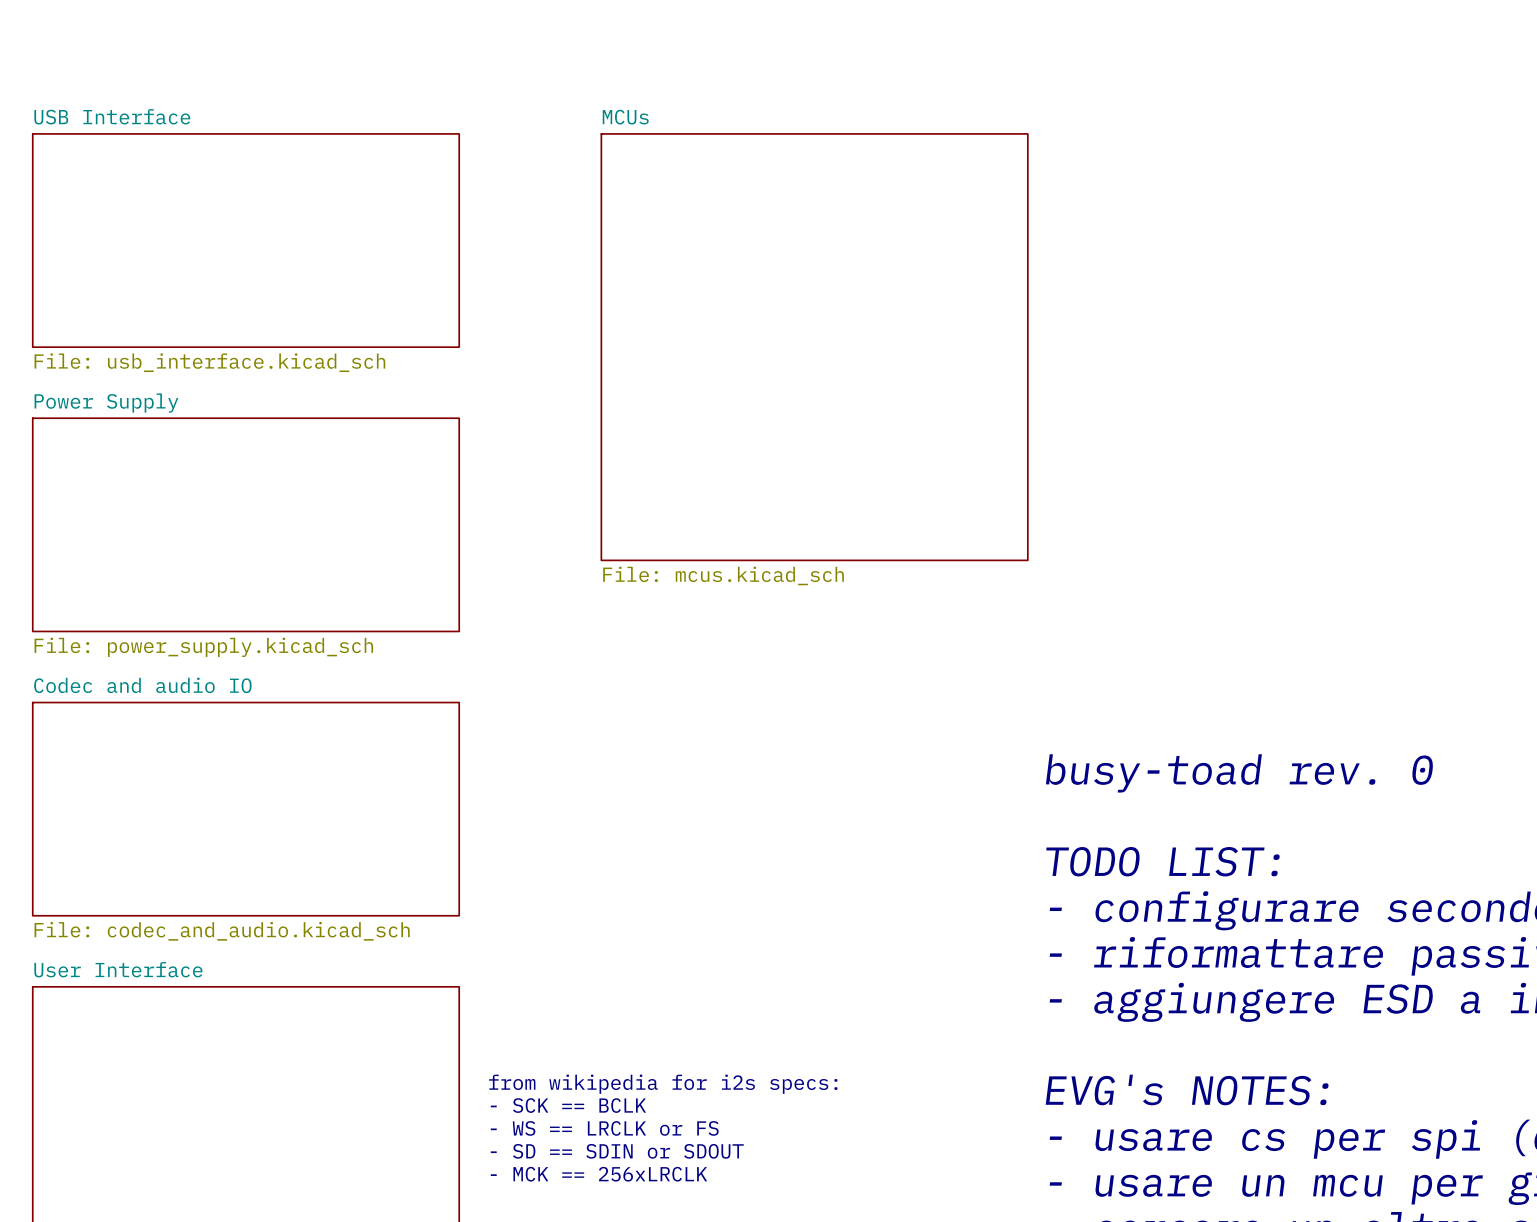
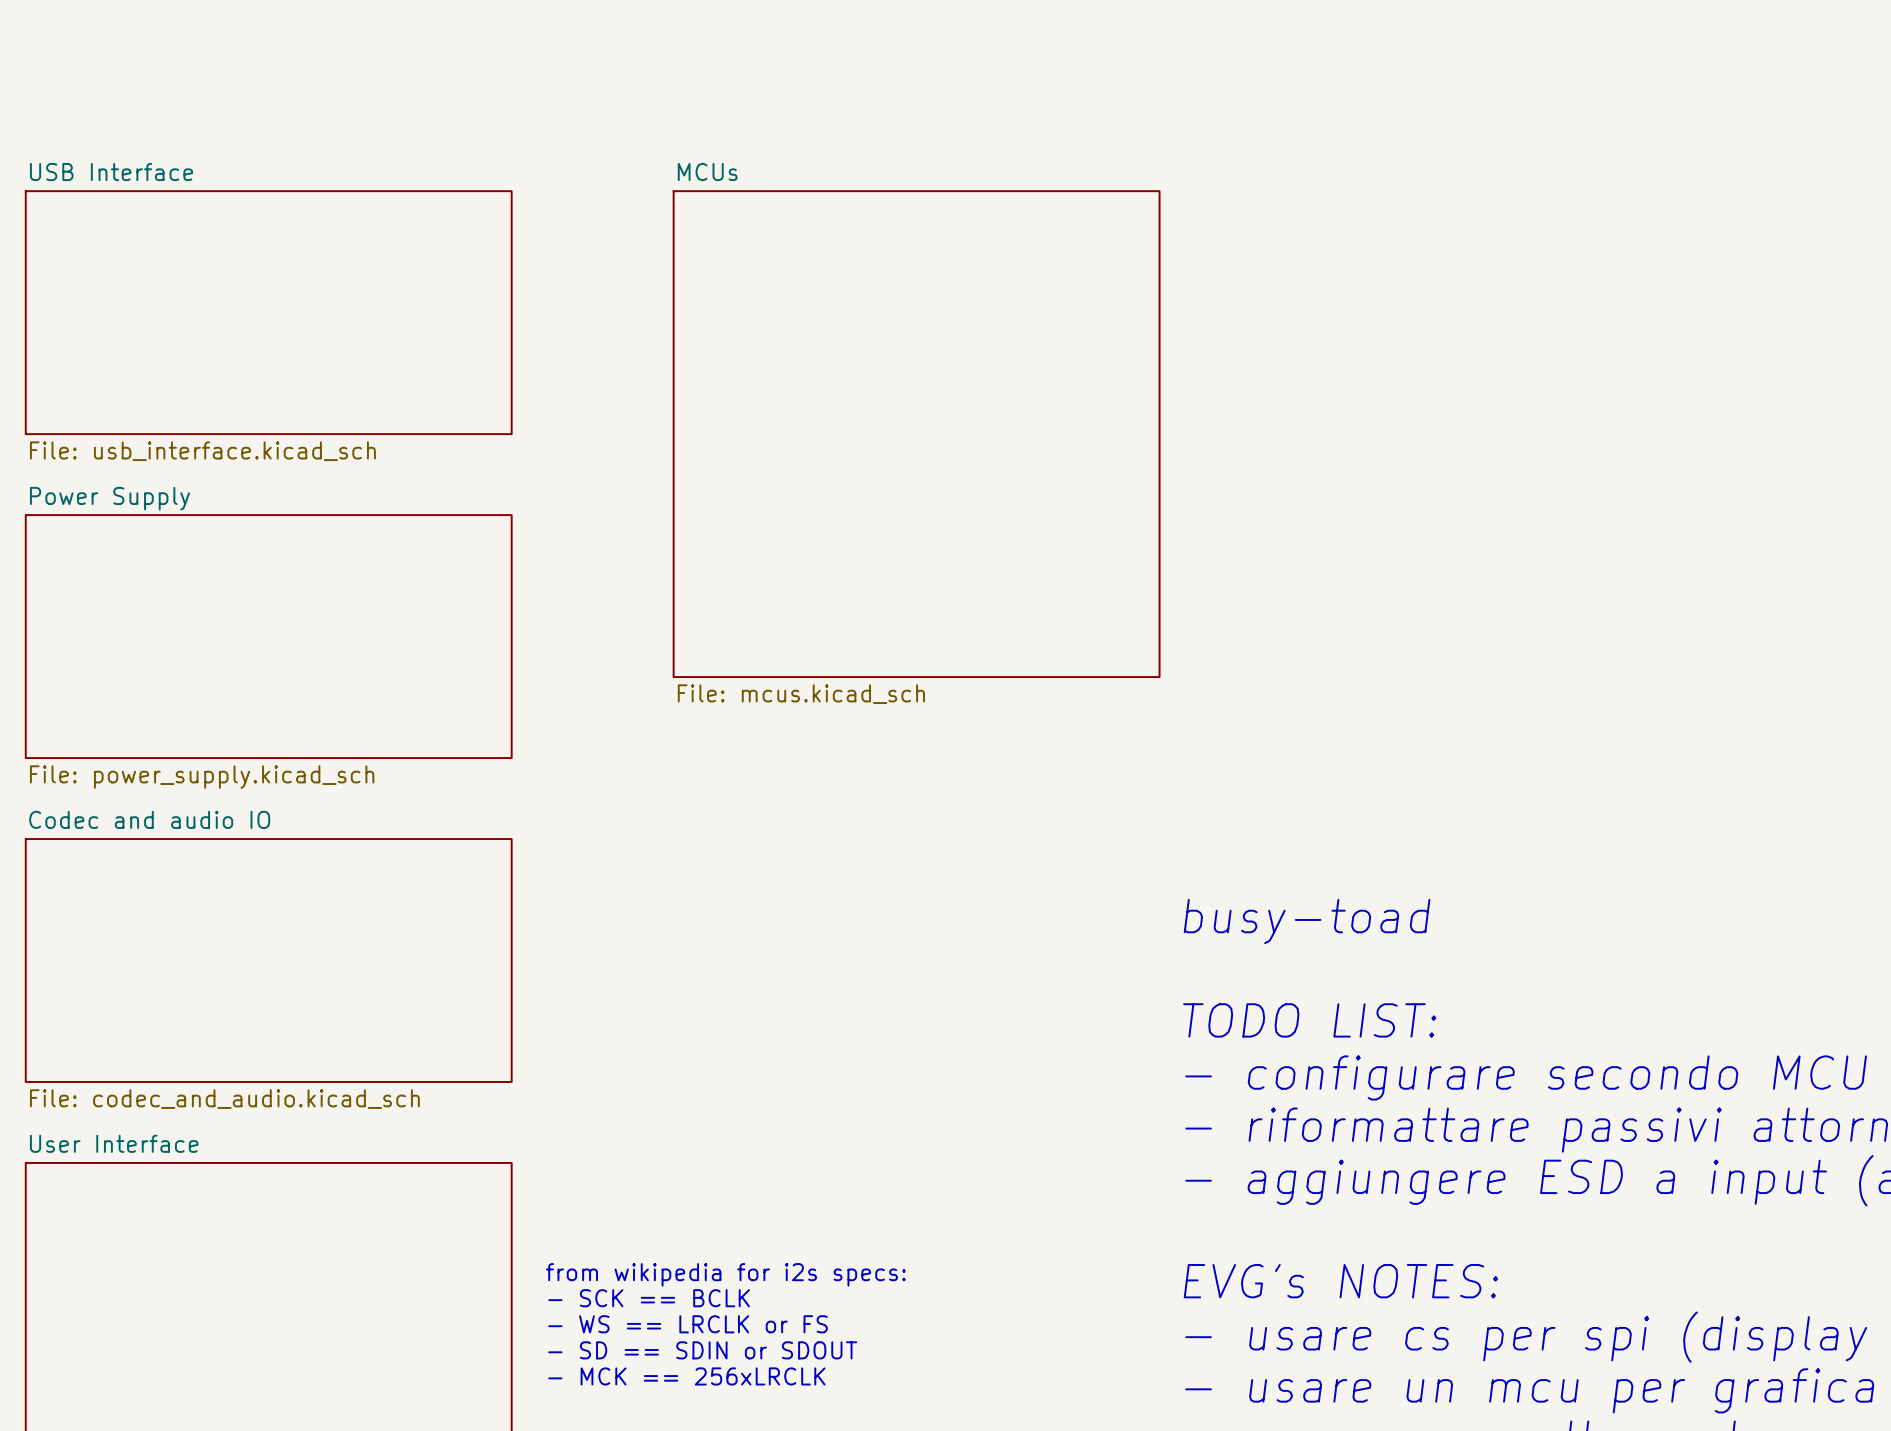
text: busy-toad rev. 0 (1239, 773) -> busy-toad (1307, 921)

